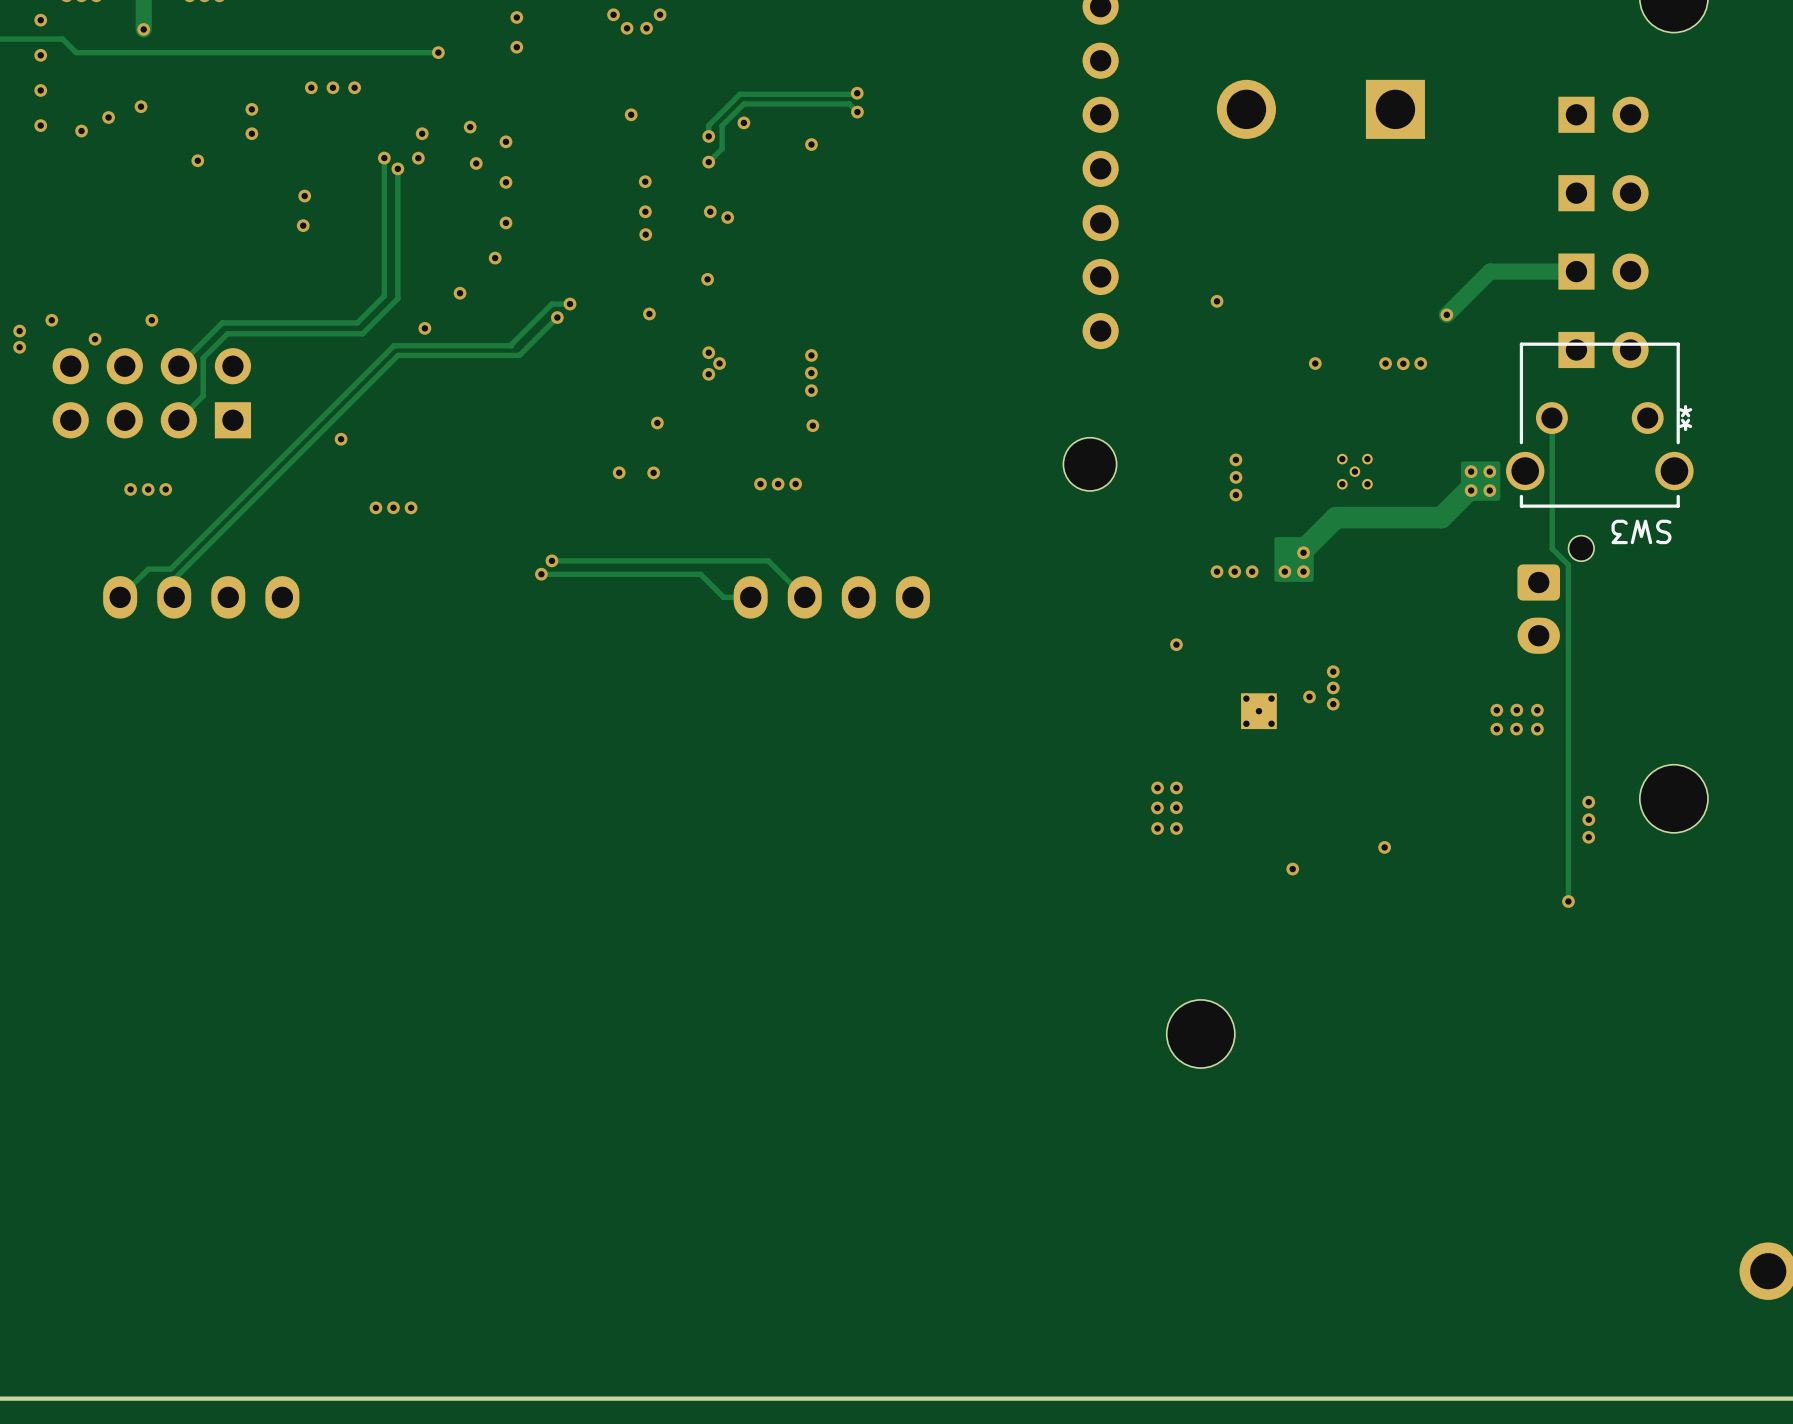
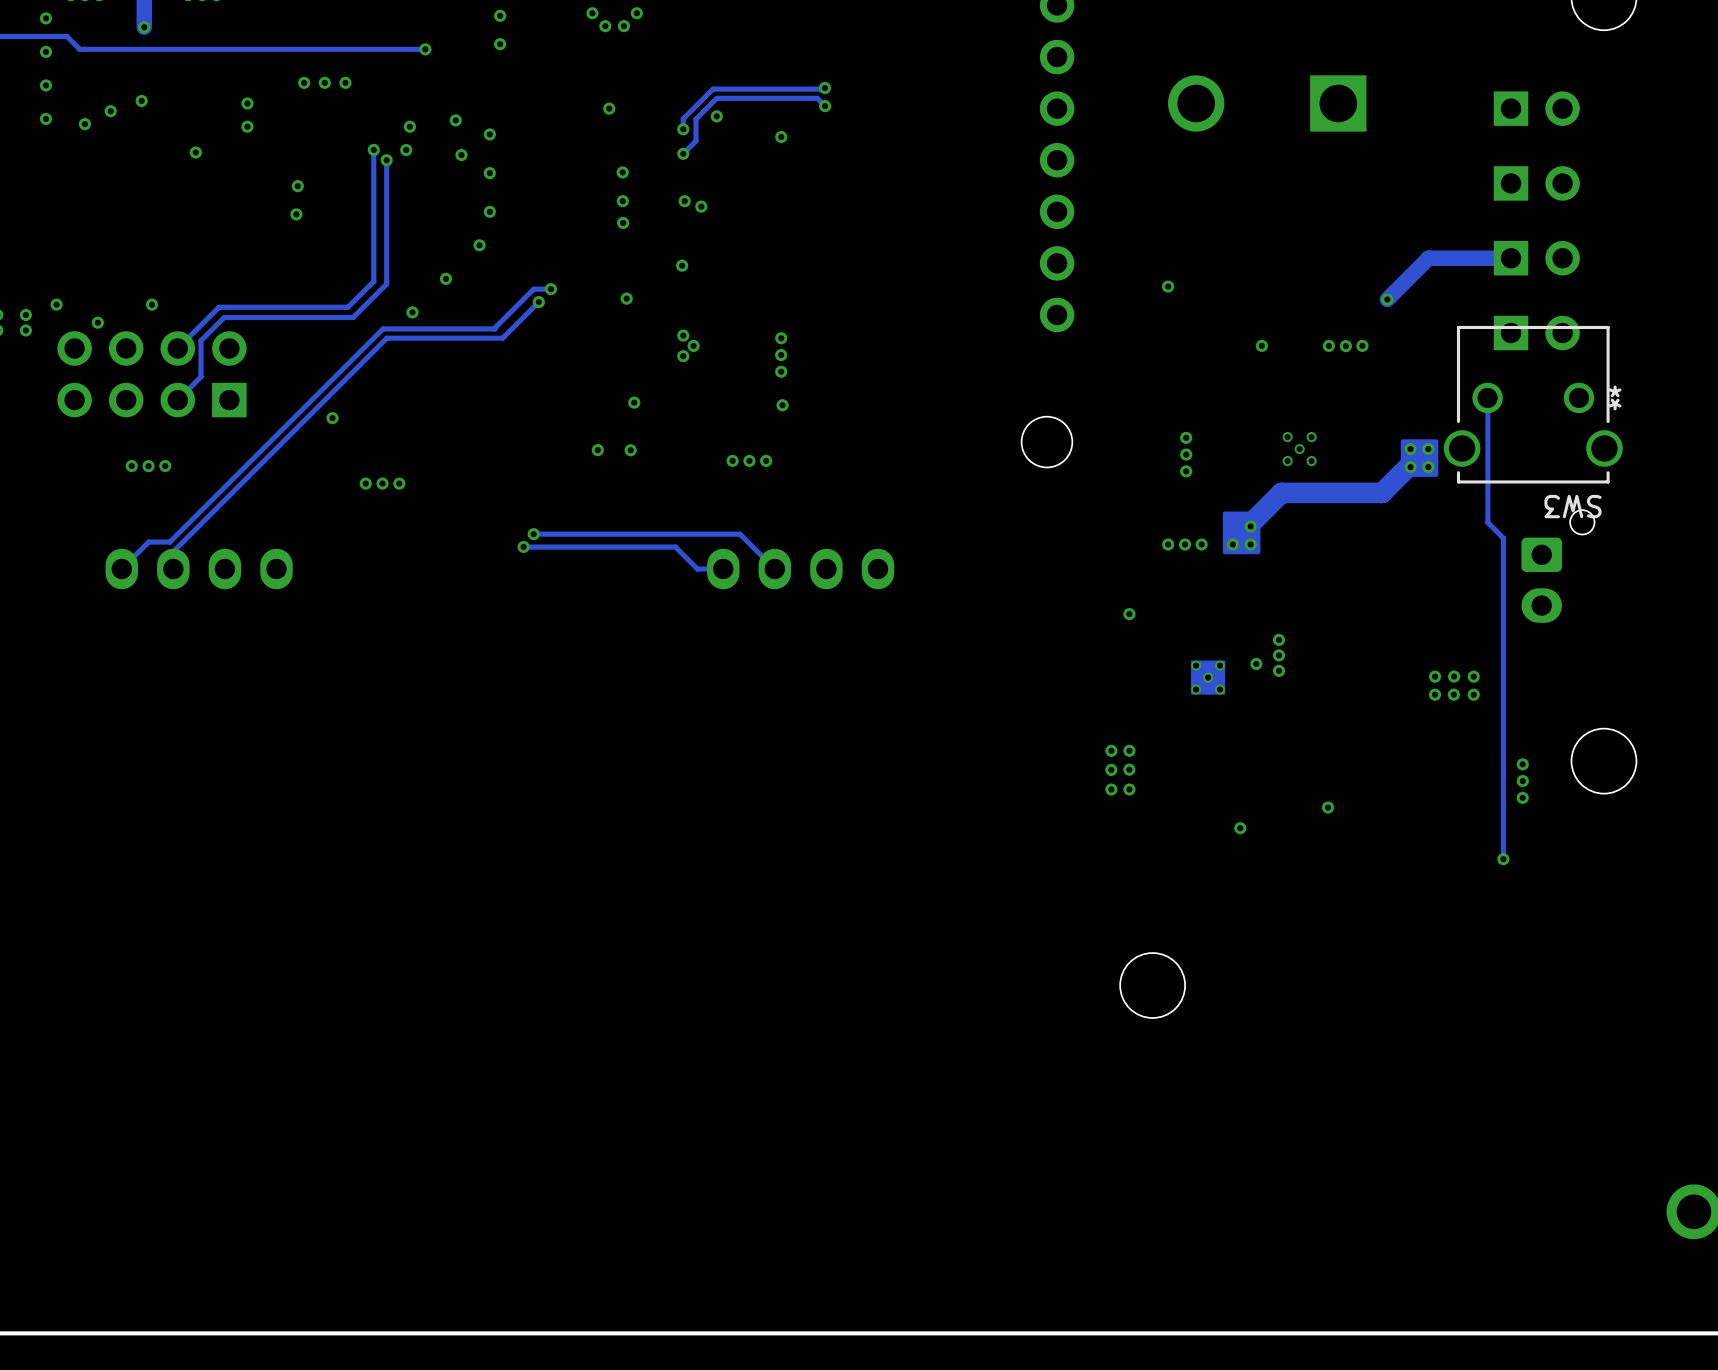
part position: (1555, 594) -> (1557, 566)

